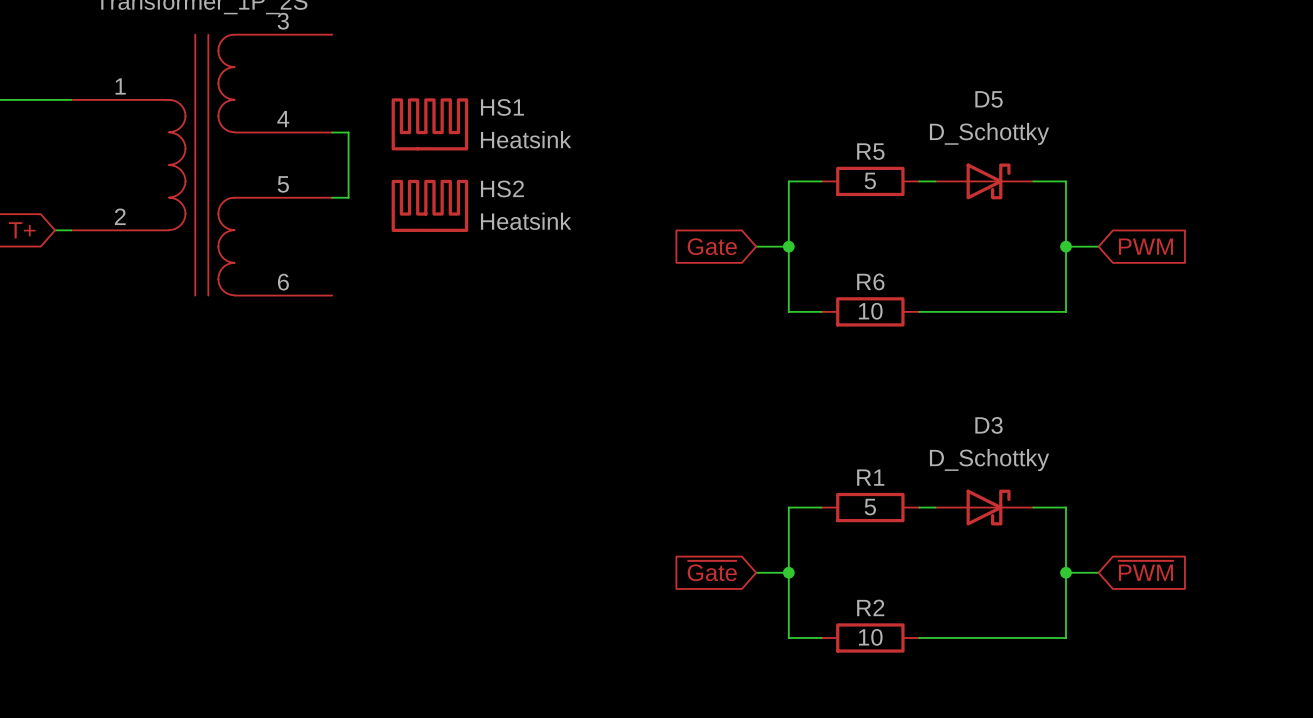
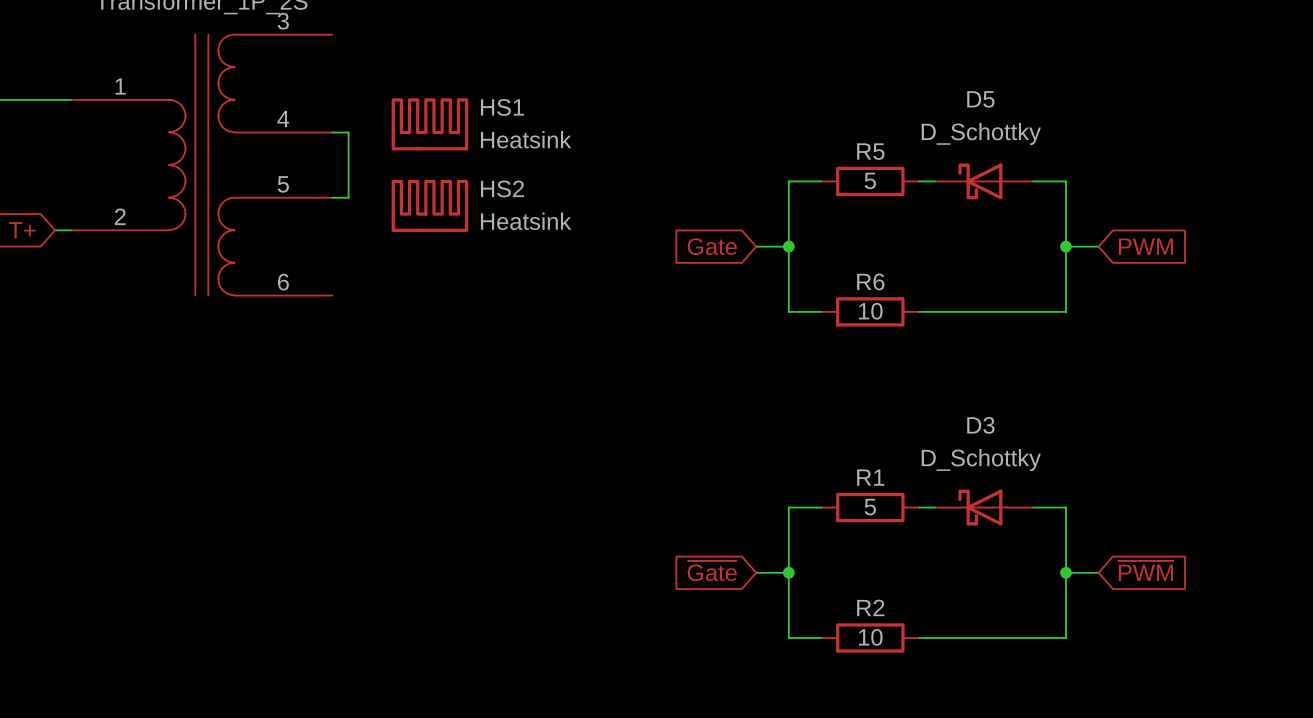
D5 flip: as is (988, 181) -> left-right (980, 181)
D3 flip: as is (988, 507) -> left-right (980, 507)

